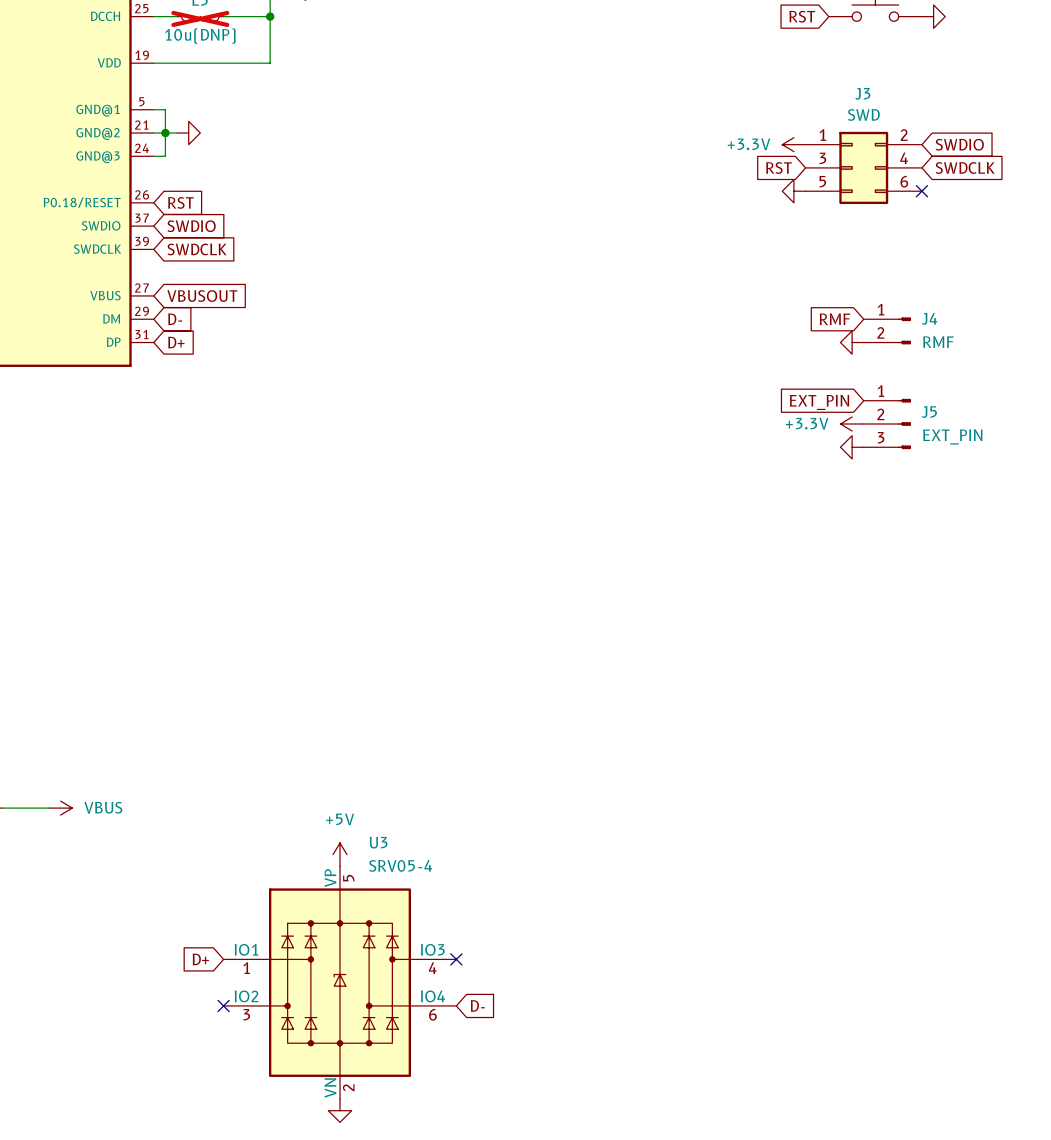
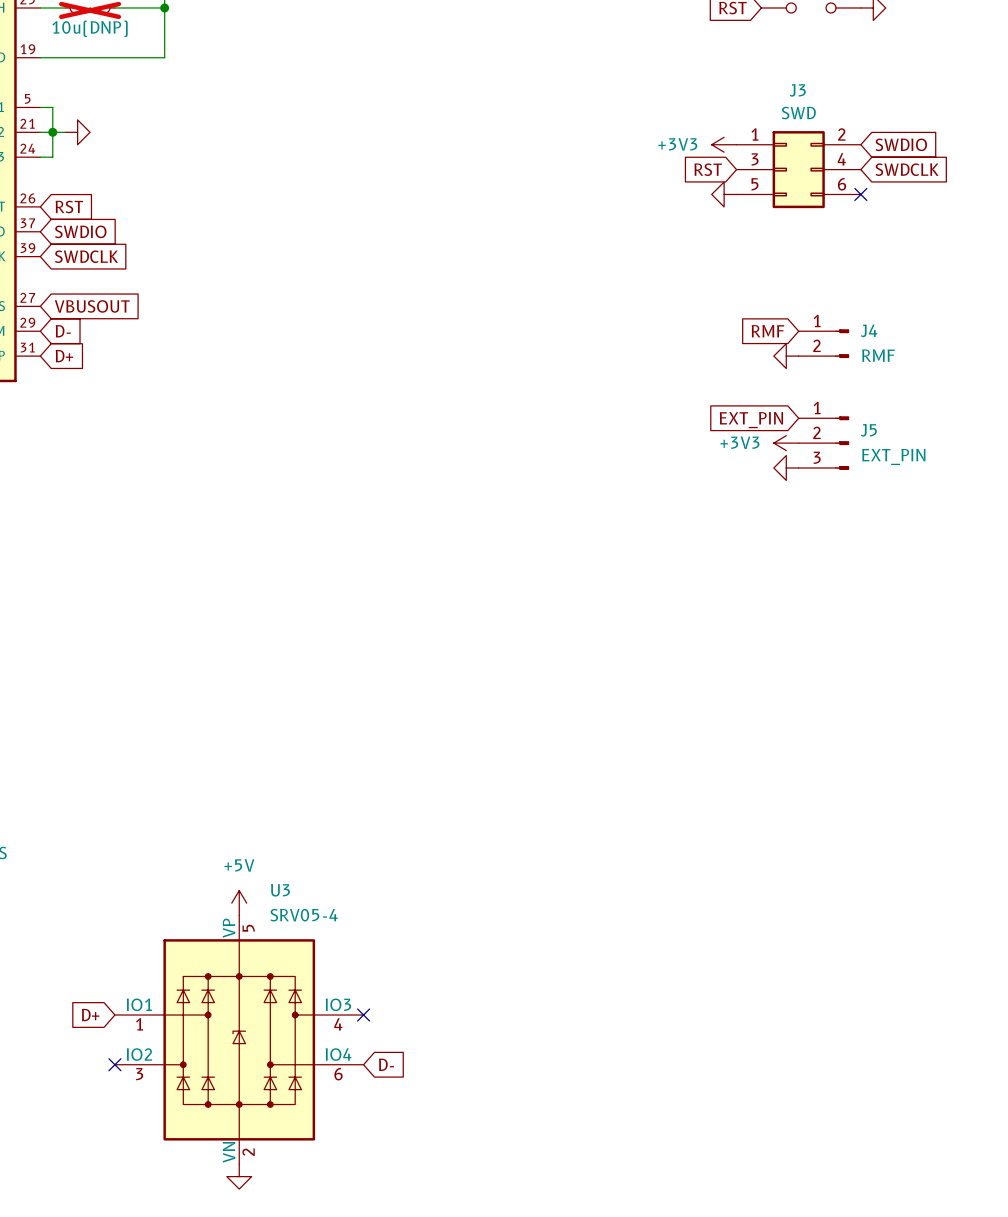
power symbol: +3.3V (793, 144) -> +3V3 (724, 144)
power symbol: +3.3V (852, 424) -> +3V3 (786, 443)

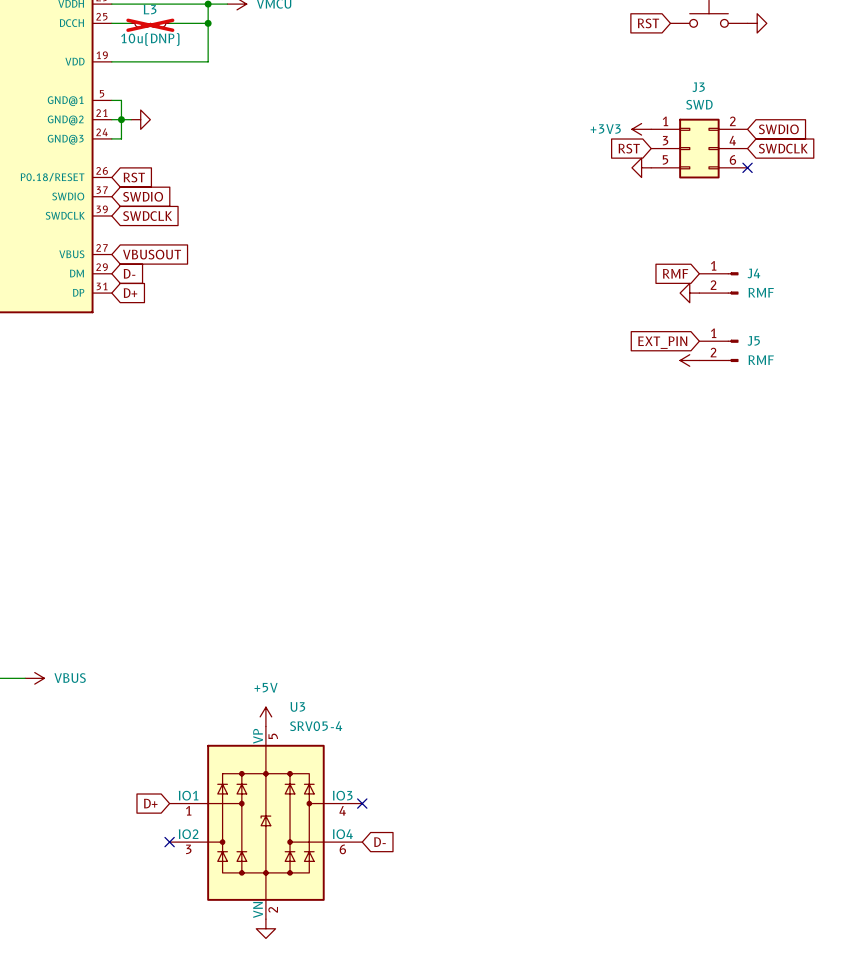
J5 symbol: [798, 416, 850, 470] -> [699, 339, 739, 363]
power symbol text: +3V3 (739, 442) -> none
J5 value: EXT_PIN (893, 456) -> RMF (761, 360)
power symbol: (786, 467) -> none

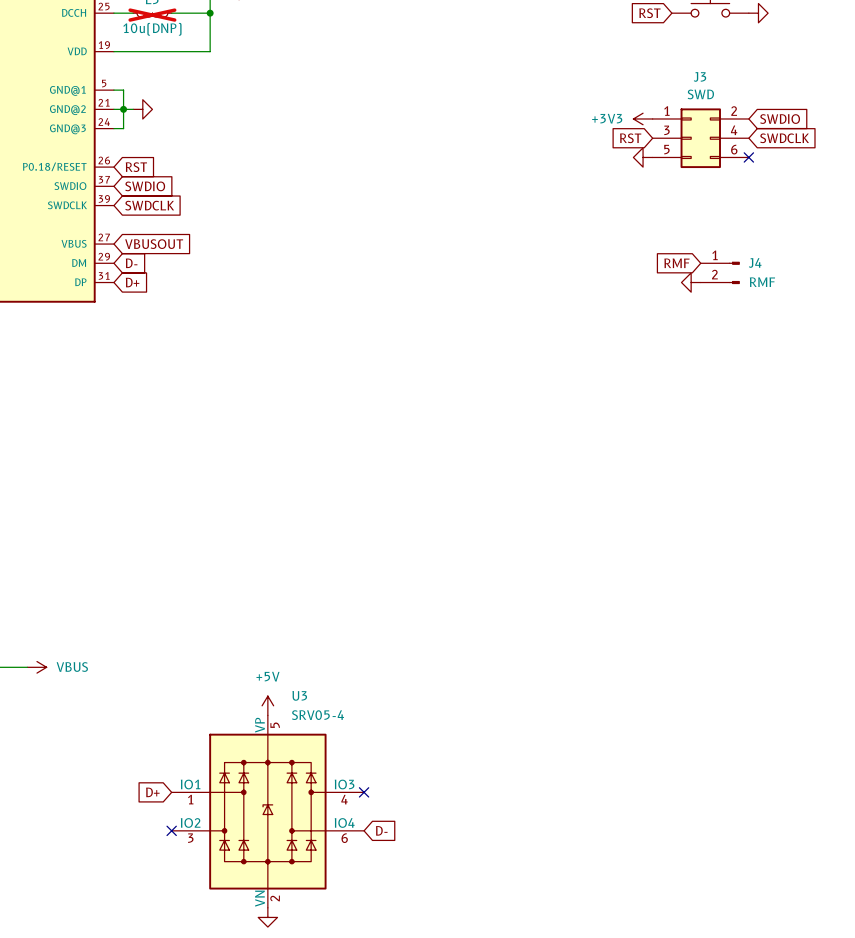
global label: EXT_PIN (662, 342) -> none
J5: RMF (718, 350) -> none
power symbol: (689, 360) -> none

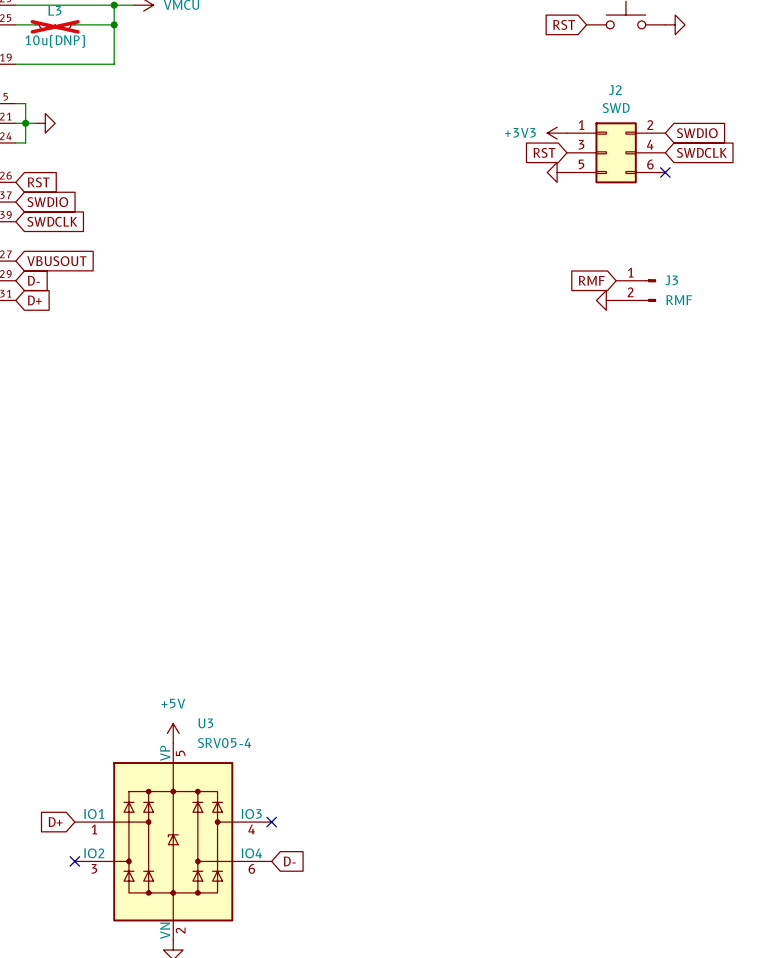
J3 name: J3 (699, 76) -> J2 (615, 90)
J4 name: J4 (755, 262) -> J3 (671, 280)

